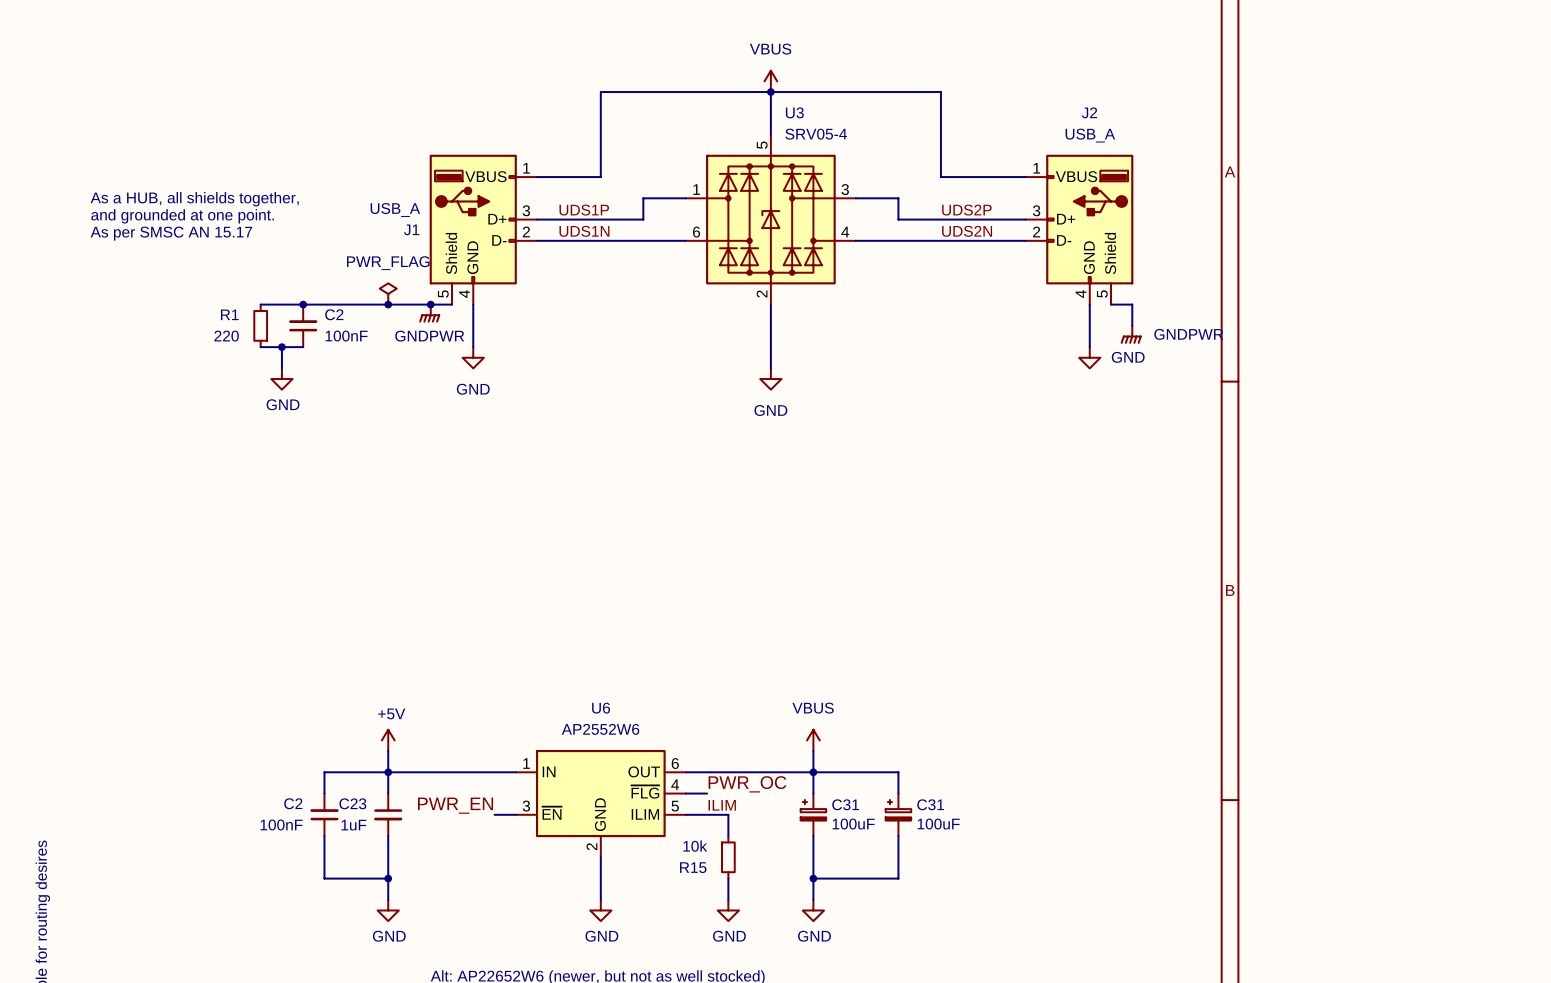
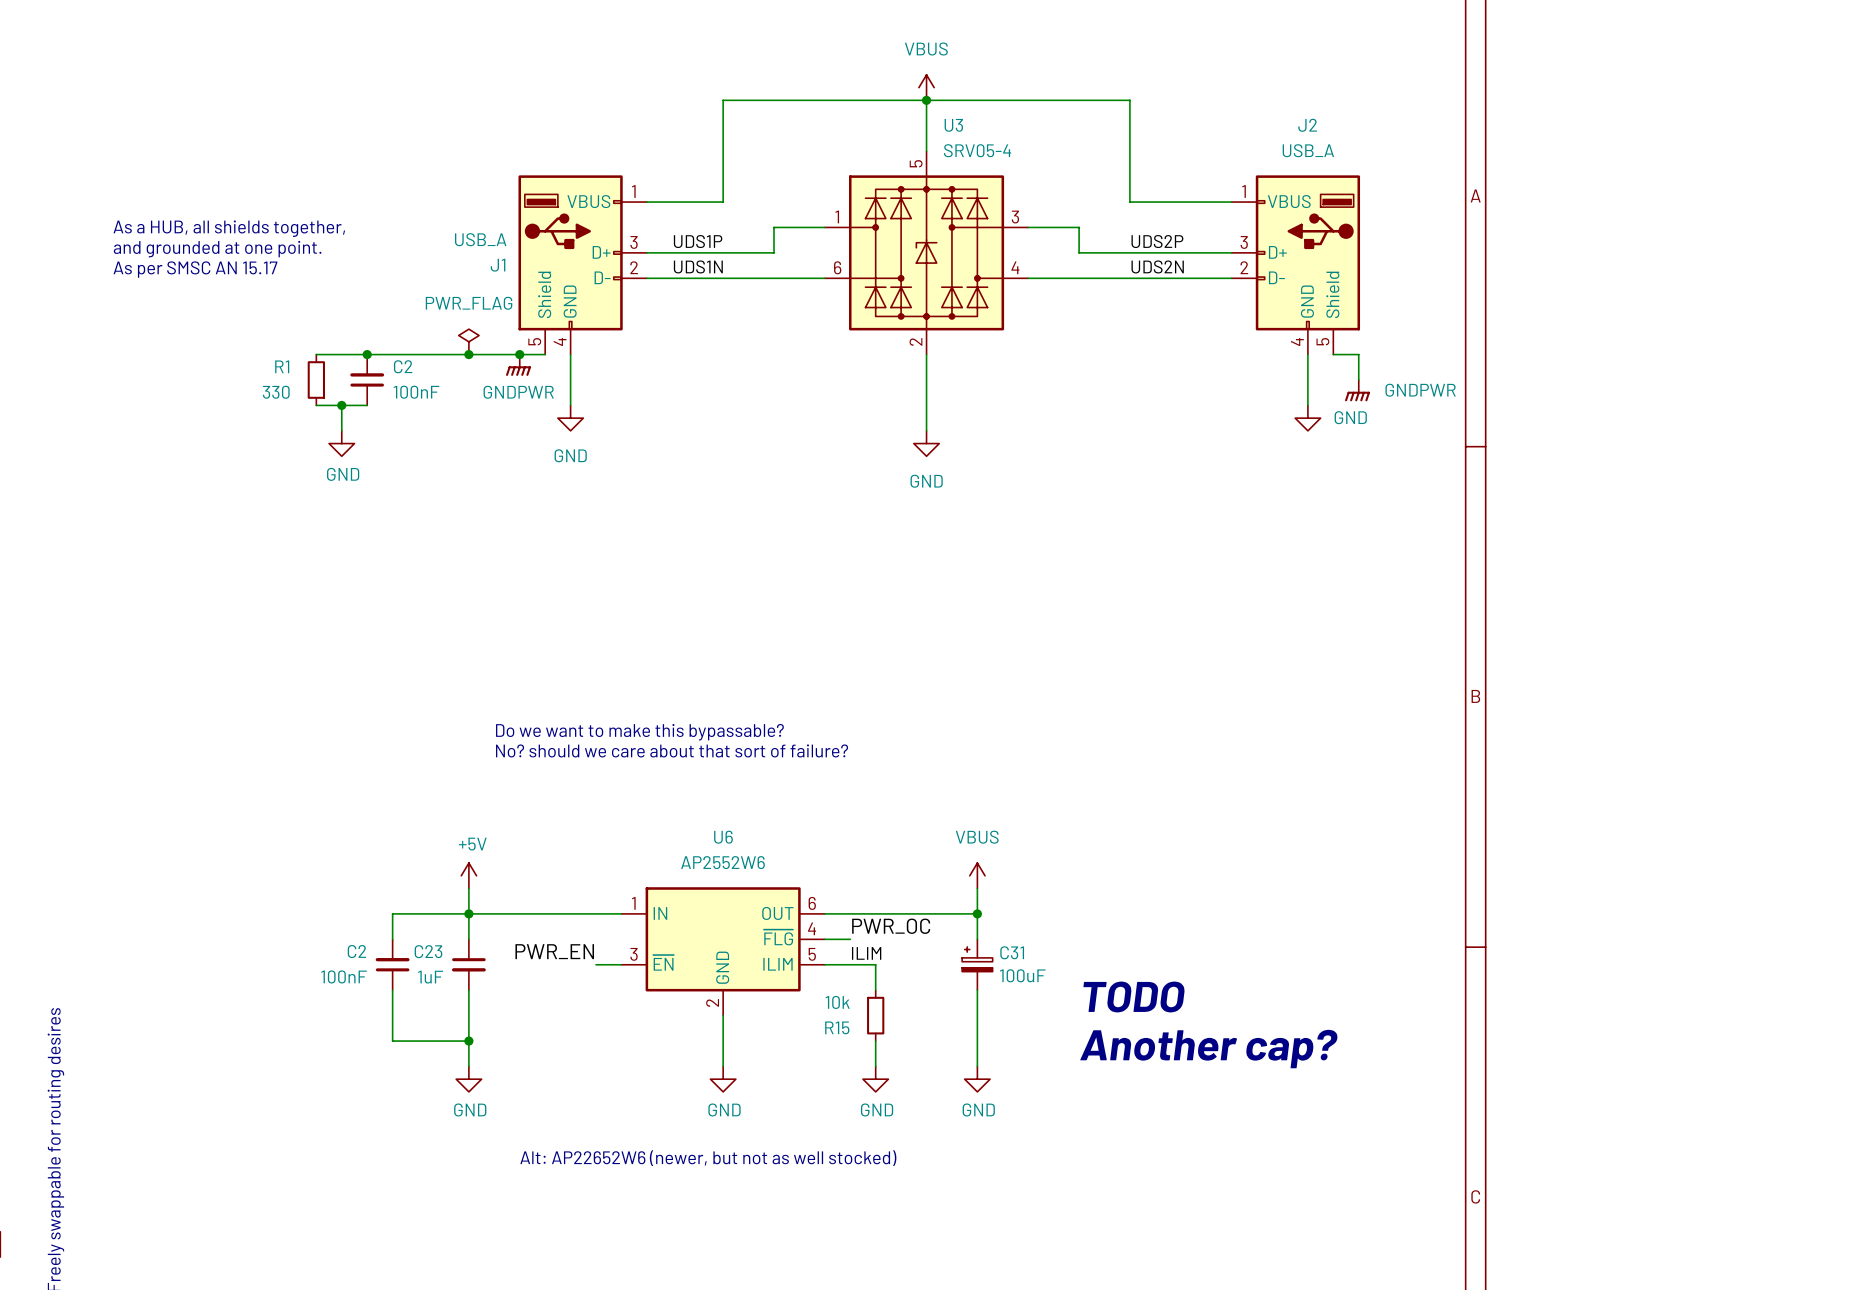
R1 value: 220 (226, 336) -> 330 (276, 392)
text: none -> Do we want to make this bypassable? (639, 732)
text: none -> No? should we care about that sort of failure? (672, 750)
wire: (813, 772) (898, 772) (898, 793) -> none
C31: 100uF (898, 814) -> none
wire: (898, 836) (898, 878) (813, 878) -> none
text: none -> TODO (1134, 996)
junction: (813, 878) -> none
text: none -> Another cap? (1208, 1049)

